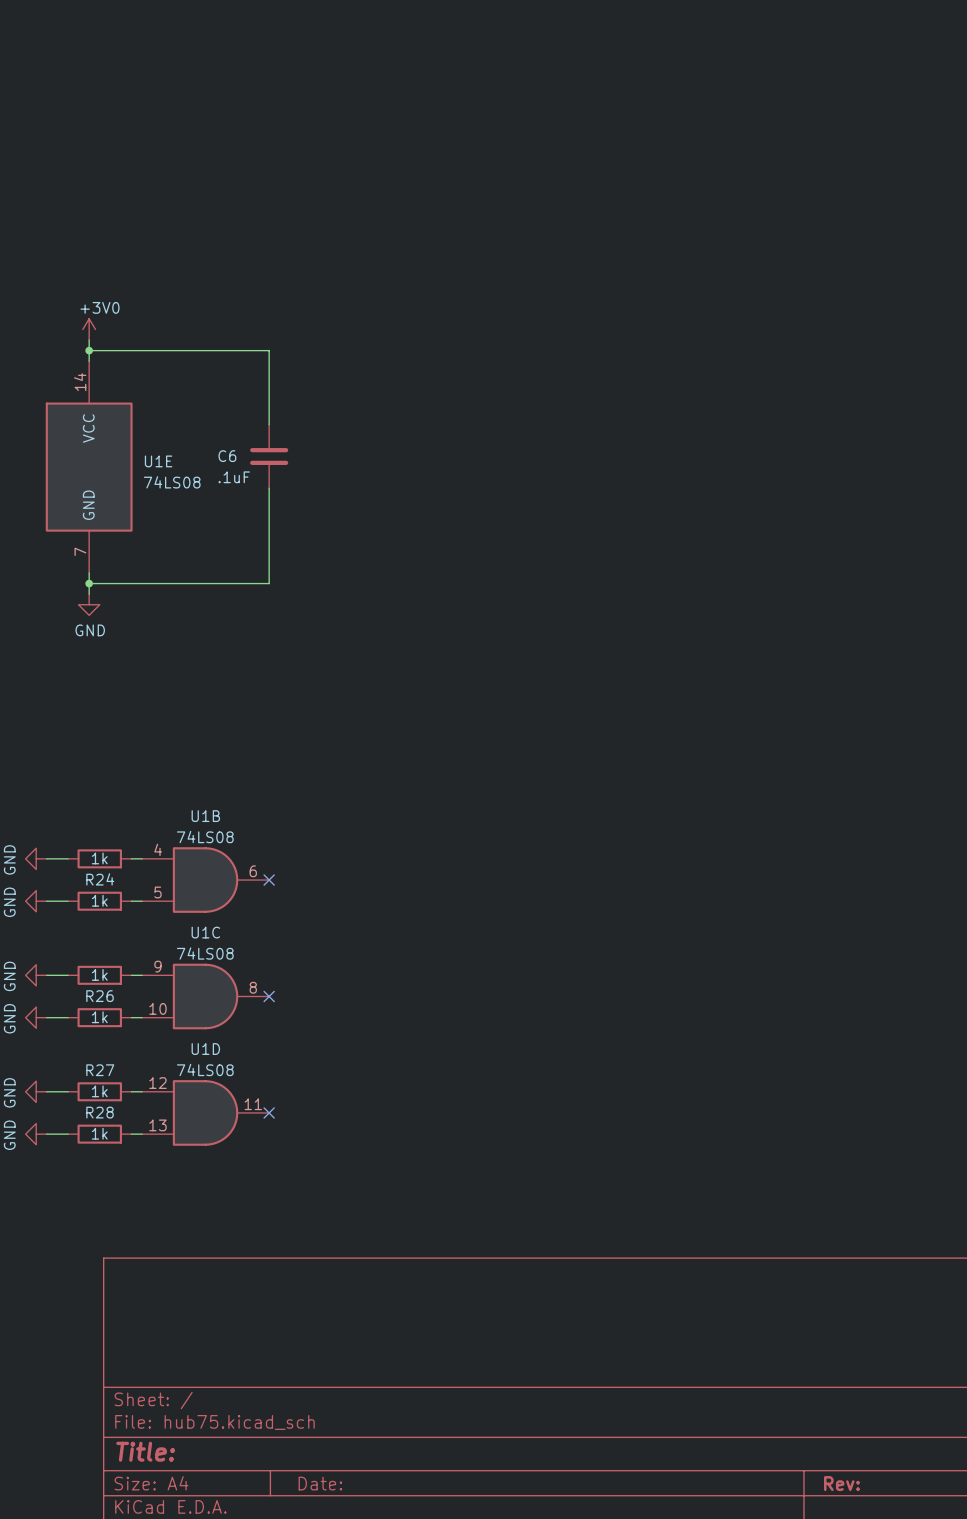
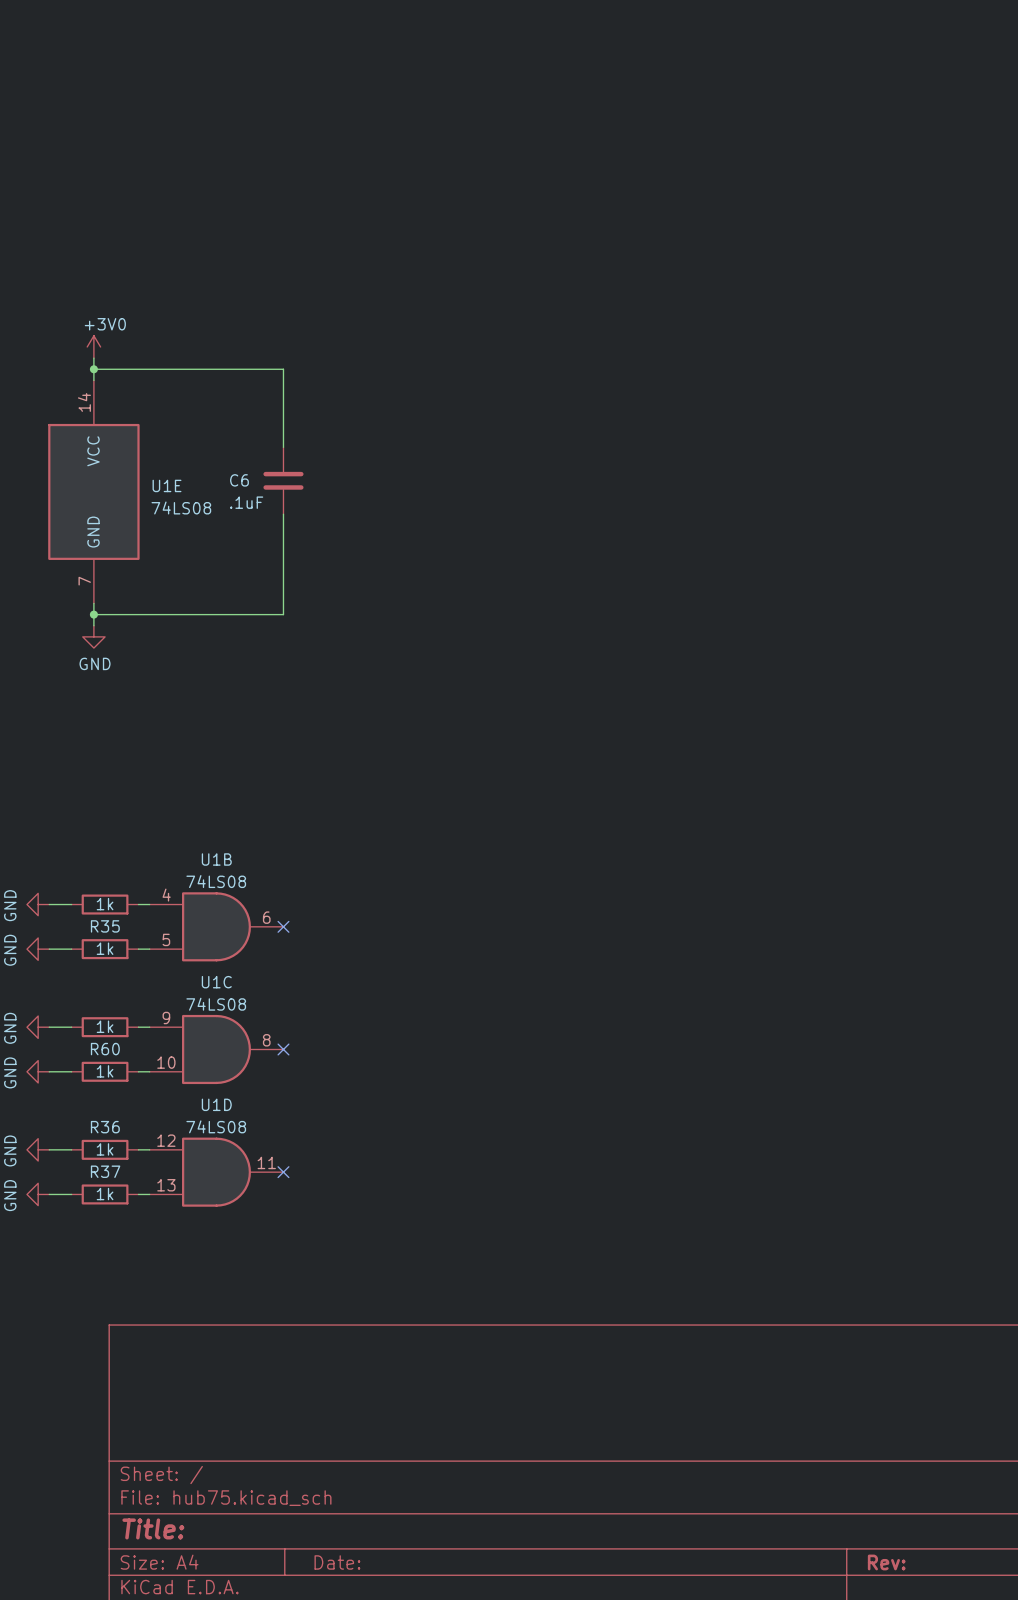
R24 name: R24 (100, 879) -> R35 (105, 926)
R26 name: R26 (100, 996) -> R60 (105, 1049)
R27 name: R27 (100, 1070) -> R36 (105, 1127)
R28 name: R28 (100, 1112) -> R37 (105, 1171)

